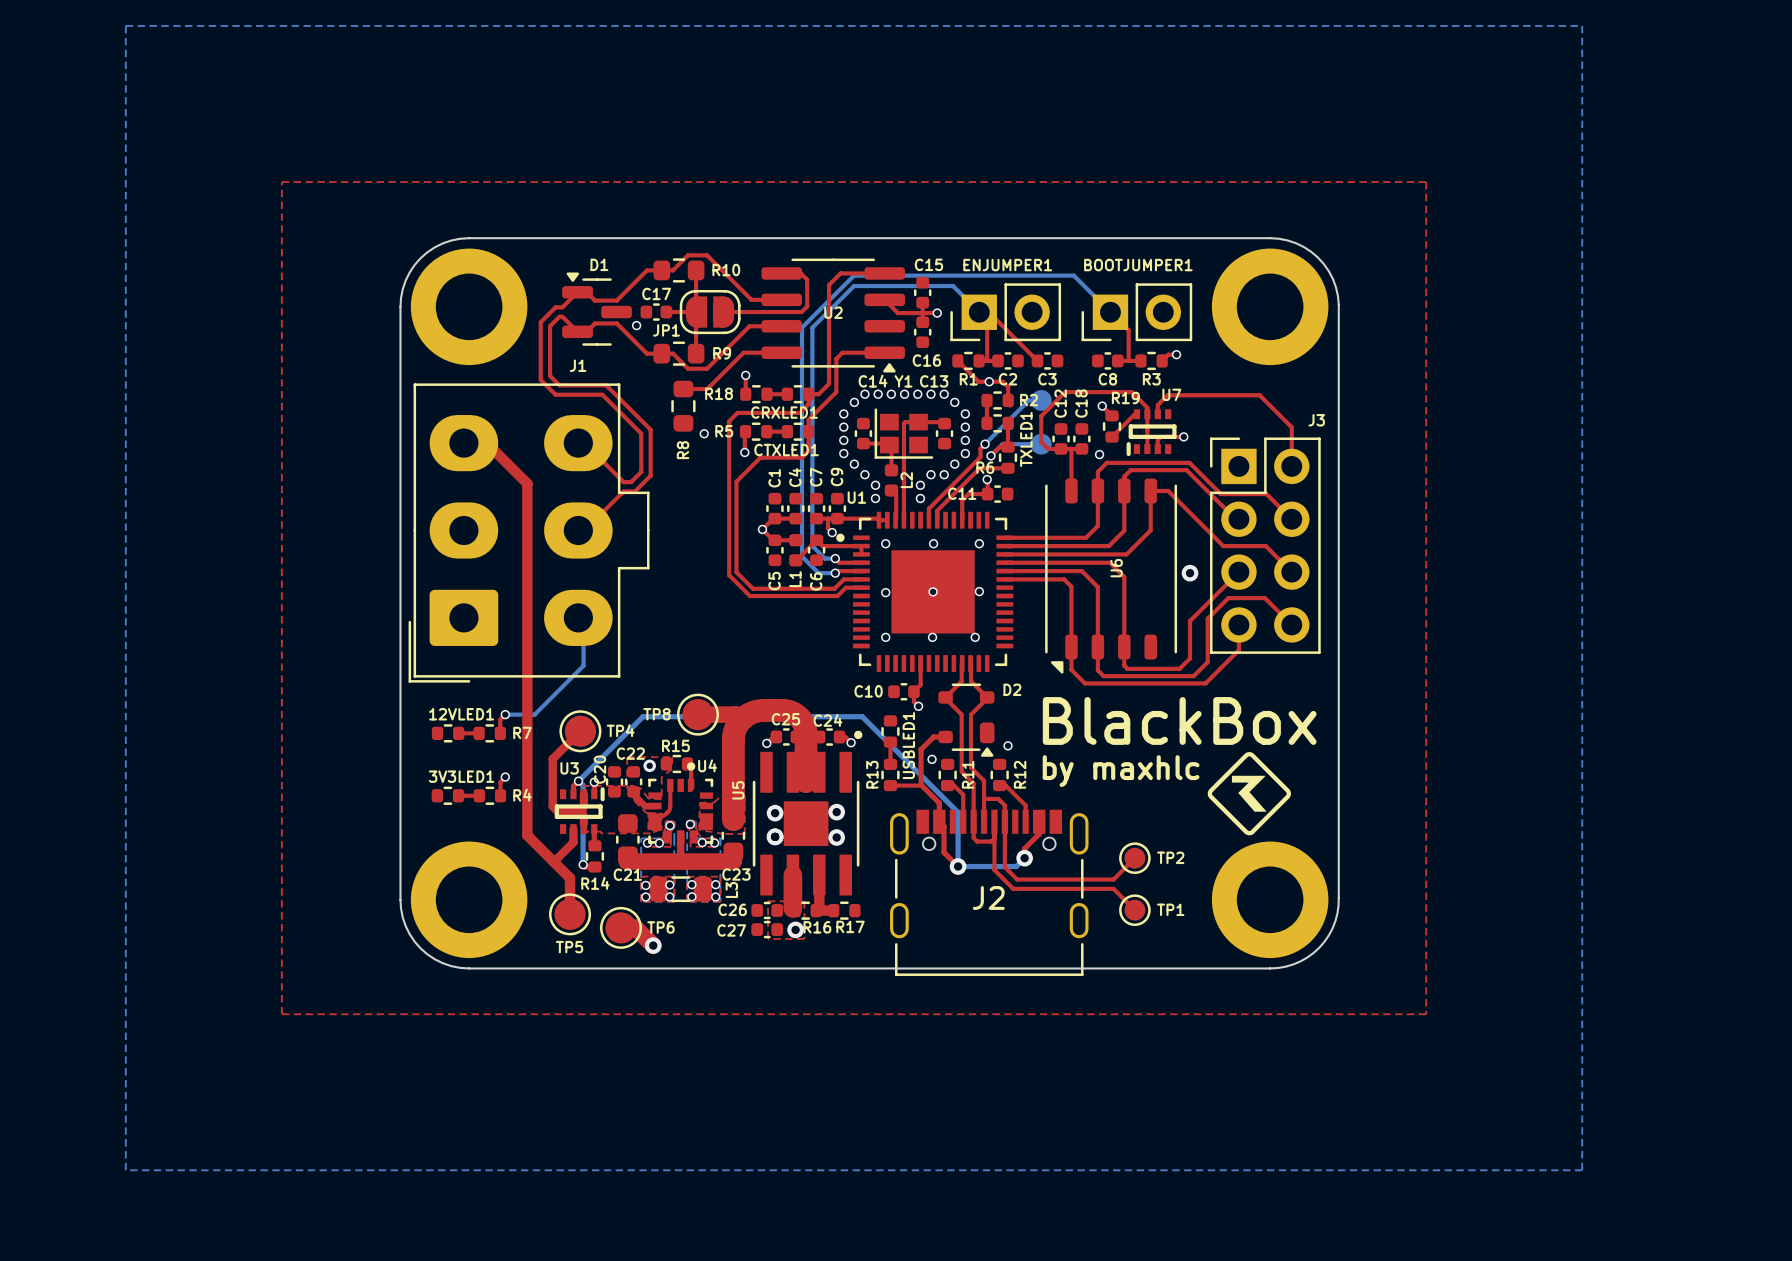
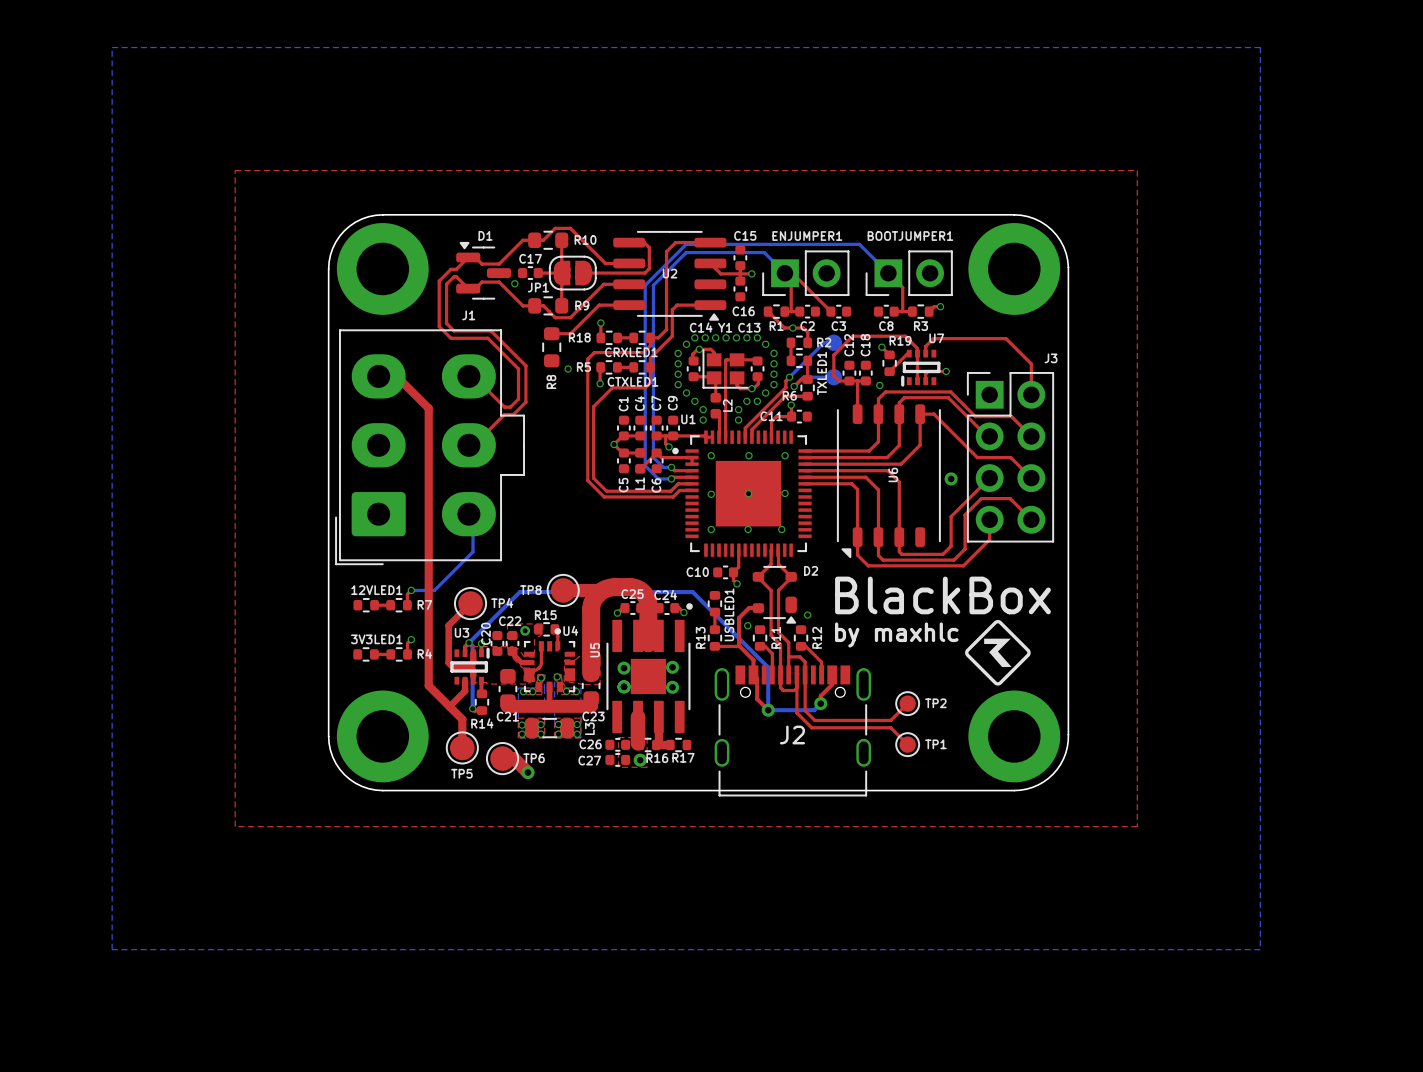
via: none -> (699, 349)
top track: none -> (714, 359) (714, 352) (710, 349) (697, 349) (692, 354) (692, 361)
top track: none -> (758, 376) (758, 383) (753, 388) (740, 388) (737, 385) (737, 377)
via: none -> (751, 388)

